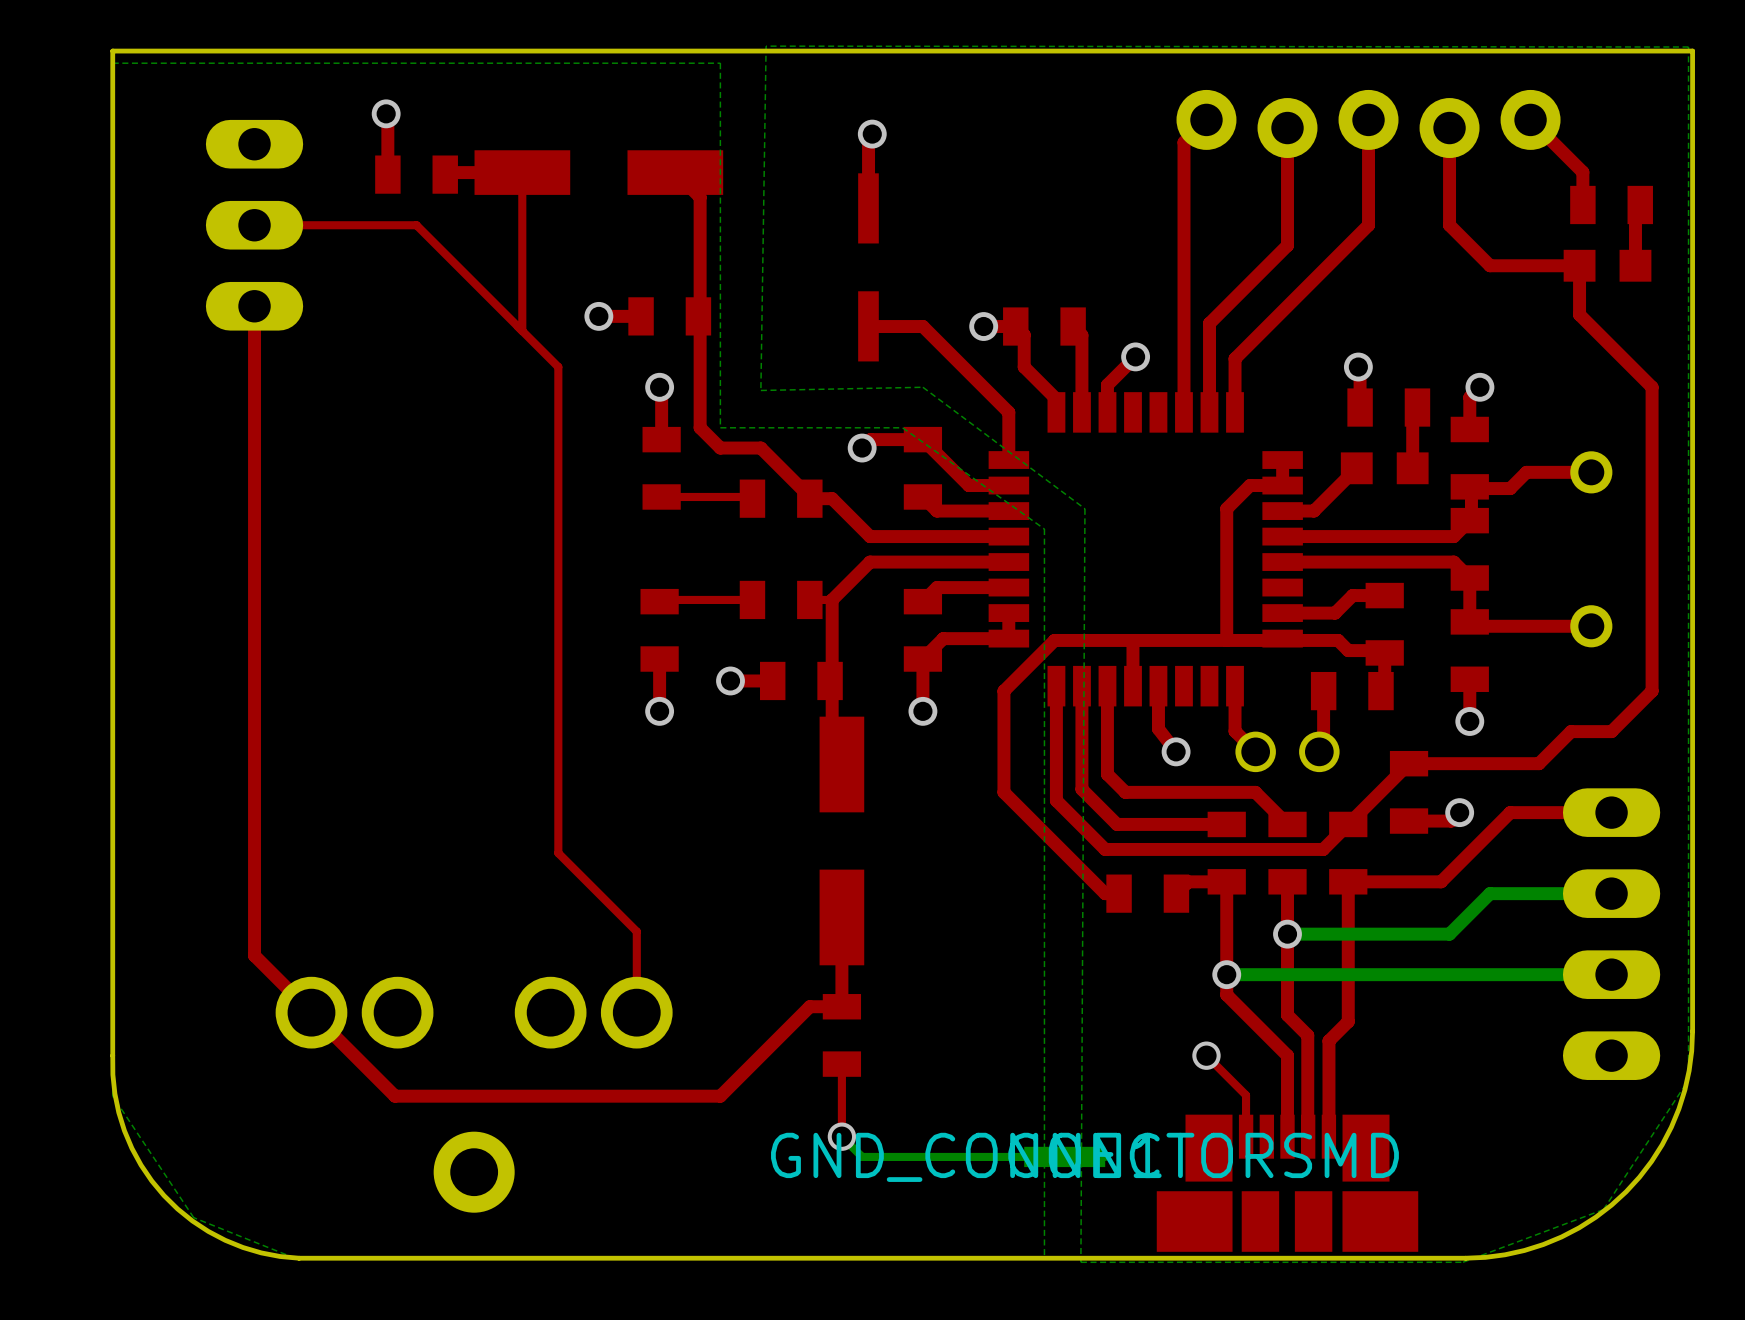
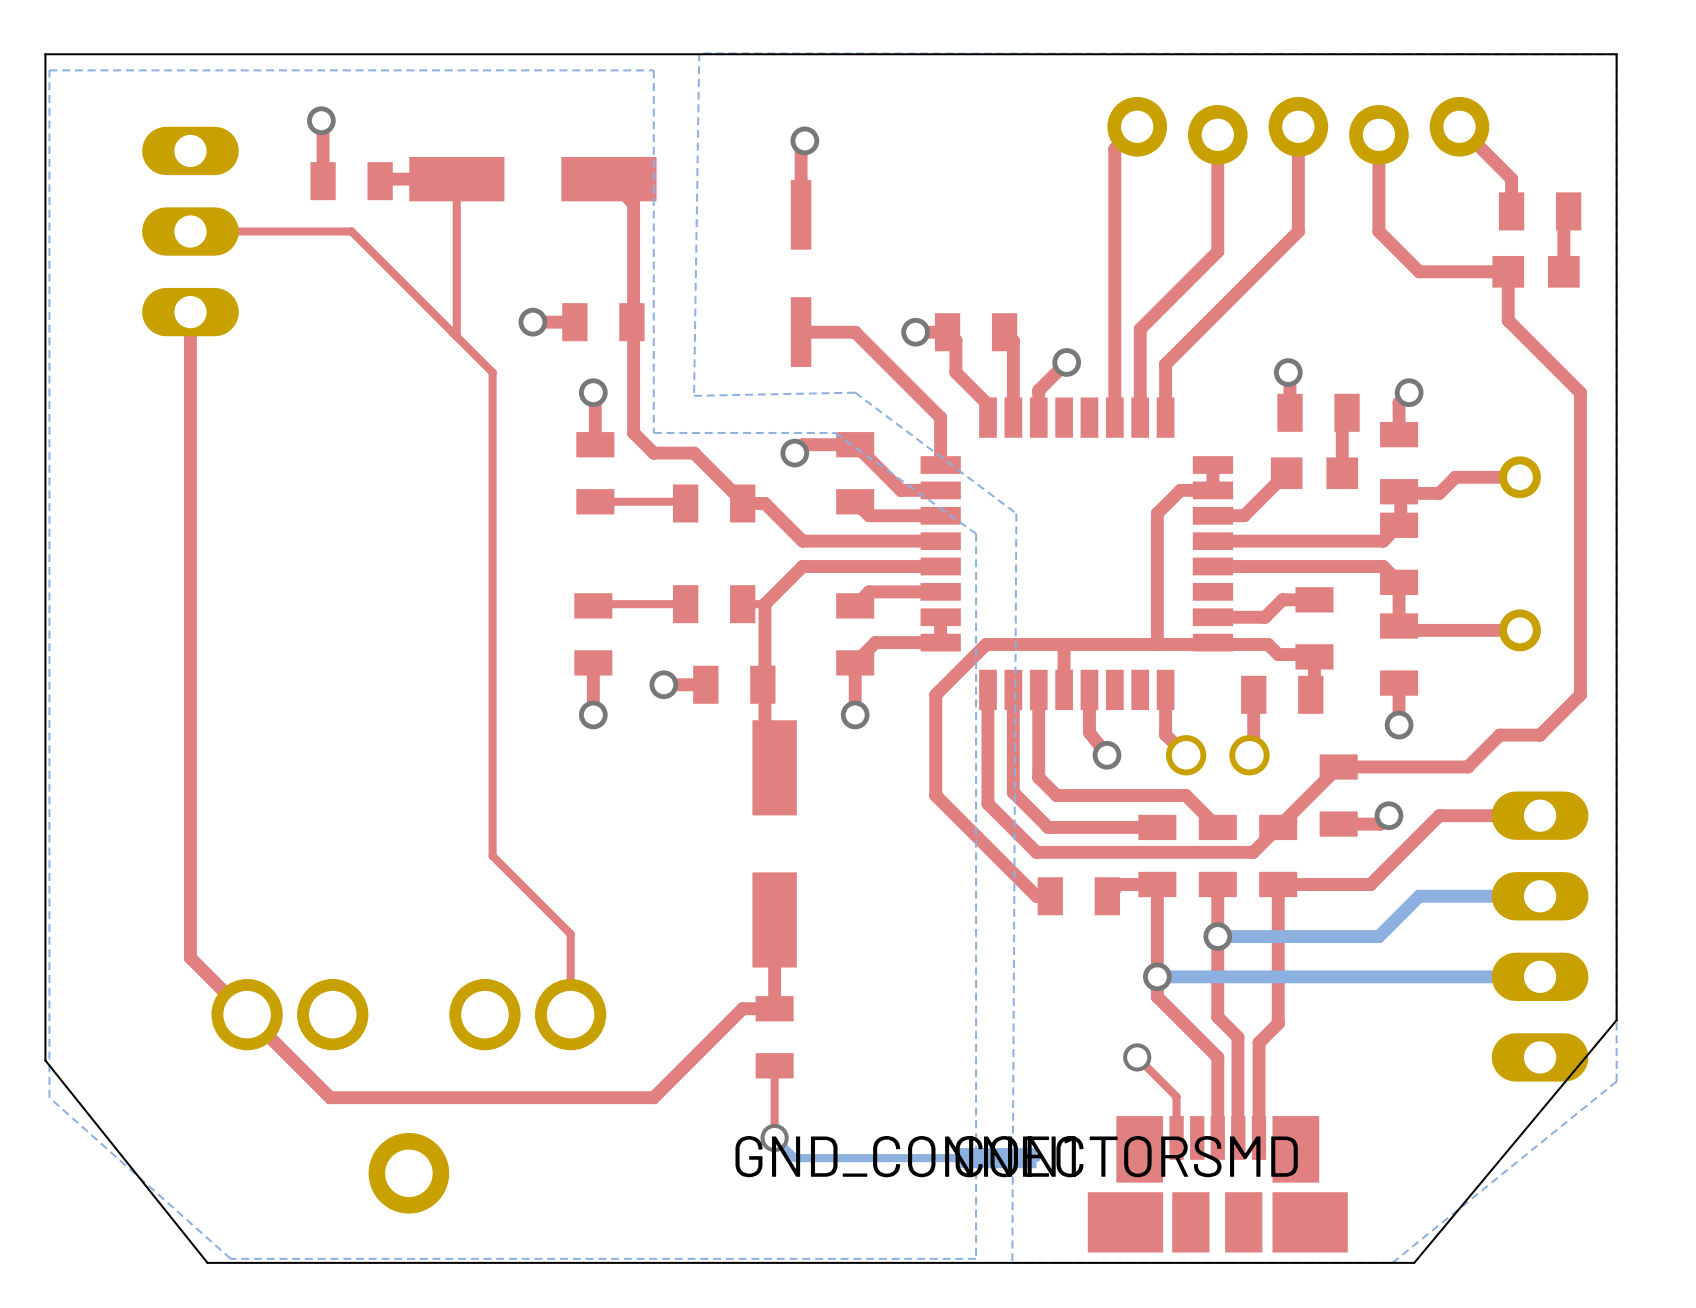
board edge: (1692, 51) (112, 51) (112, 1074) (114, 1093) (124, 1130) (131, 1148) (151, 1180) (177, 1208) (208, 1231) (242, 1247) (280, 1256) (299, 1258) (1465, 1258) (1485, 1257) (1524, 1250) (1561, 1236) (1595, 1217) (1626, 1191) (1639, 1177) (1662, 1144) (1671, 1127) (1684, 1090) (1691, 1051) (1692, 51) -> (1616, 54) (1616, 1020) (1414, 1262) (207, 1262) (45, 1060) (45, 54) (1616, 54)
bottom zone outline: (1688, 1079) (1603, 1209) (1463, 1262) -> (1616, 1081) (1392, 1262)
bottom zone outline: (112, 1096) (193, 1217) (295, 1258) -> (49, 1097) (230, 1258)

